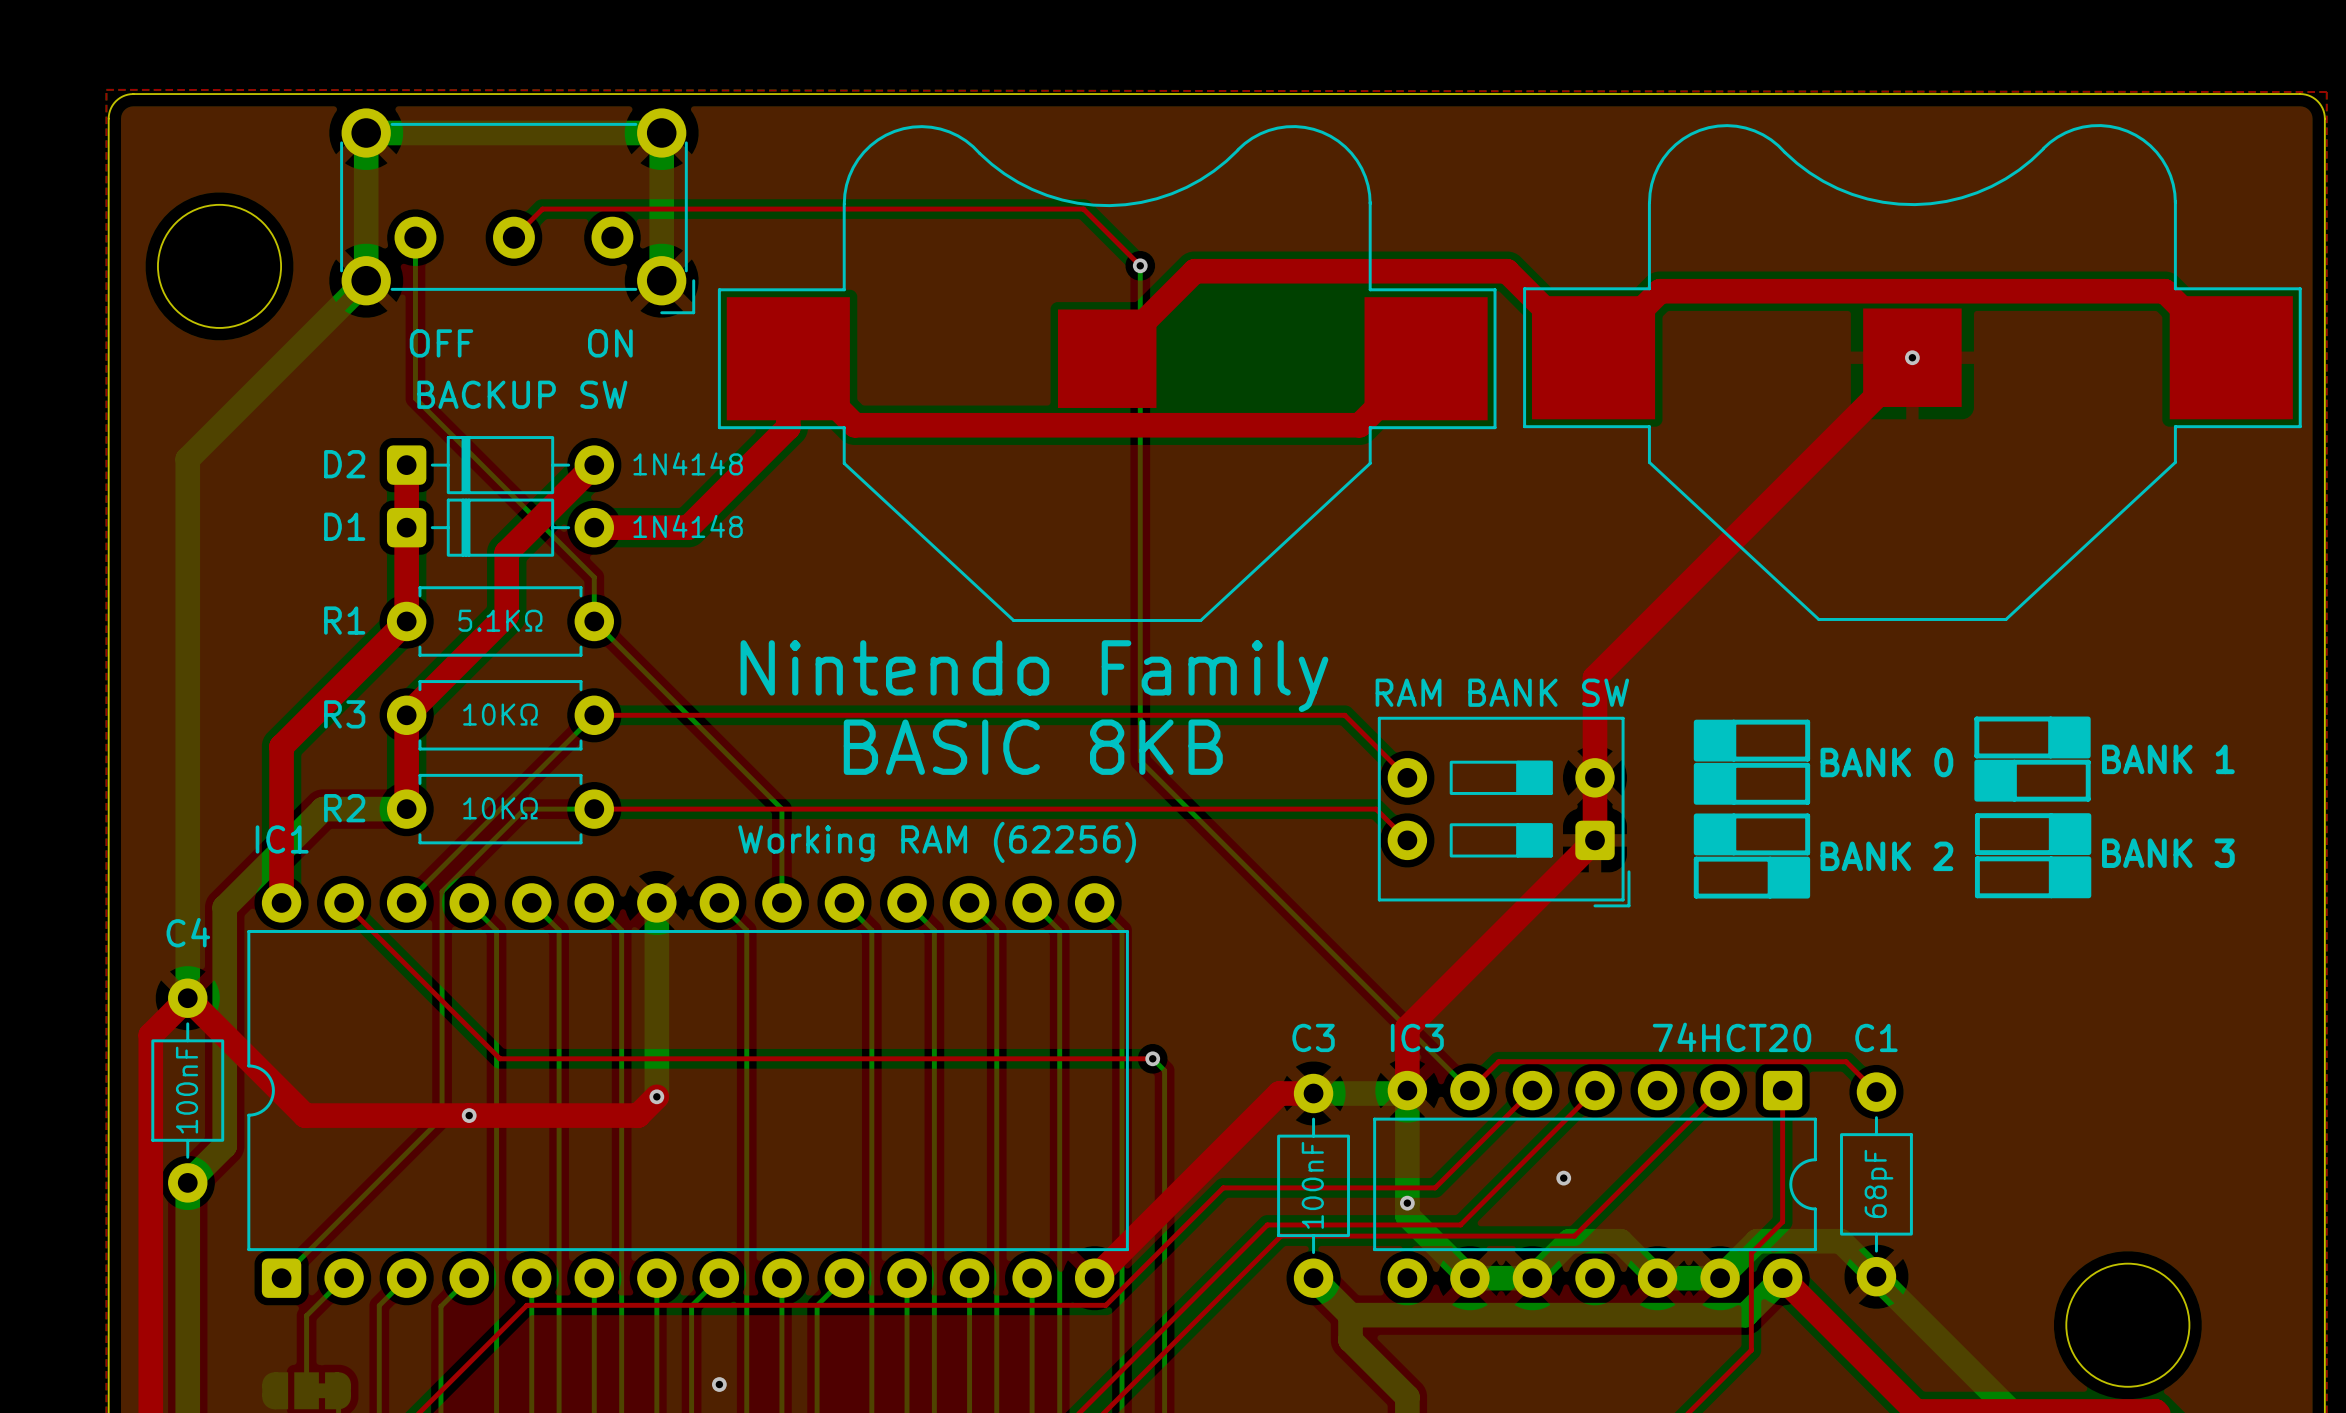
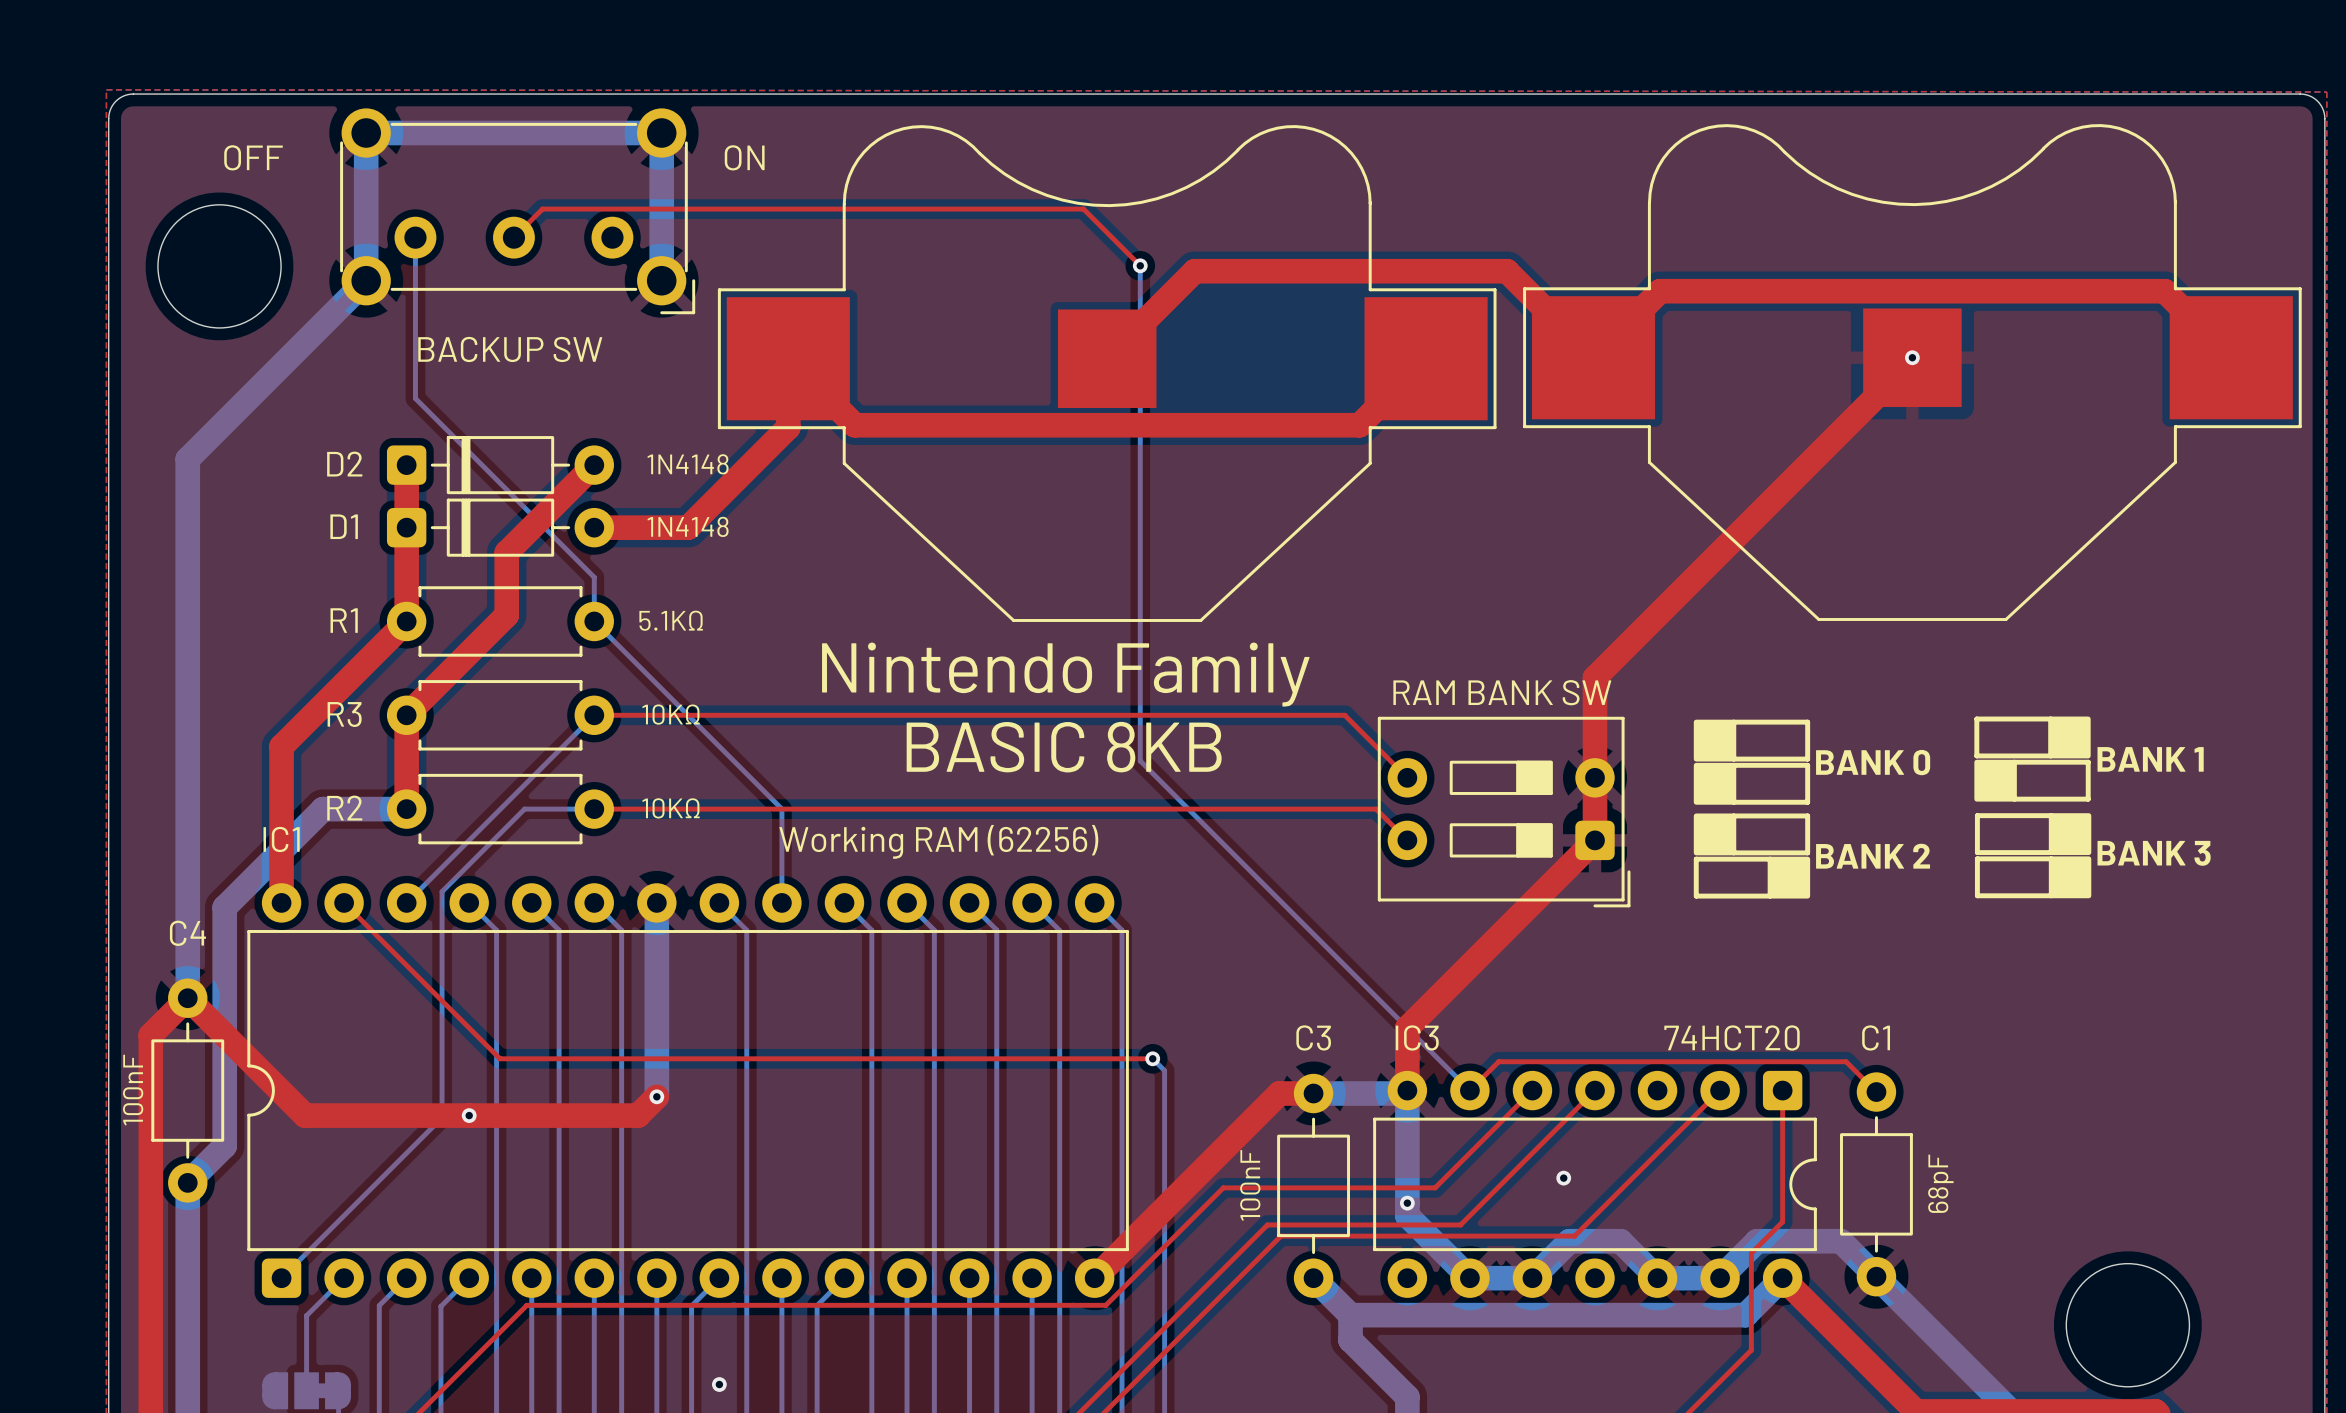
text position: OFF (441, 343) -> OFF (253, 157)
text position: ON (610, 343) -> ON (744, 157)
part value position: BACKUP SW (522, 394) -> BACKUP SW (510, 349)
R1 value position: 5.1KΩ (500, 620) -> 5.1KΩ (671, 620)
text position: Nintendo Family (1034, 676) -> Nintendo Family (1065, 674)
R3 value position: 10KΩ (500, 714) -> 10KΩ (671, 714)
text position: BASIC 8KB (1033, 747) -> BASIC 8KB (1064, 747)
R2 value position: 10KΩ (500, 808) -> 10KΩ (671, 808)
C4 value position: 100nF (187, 1090) -> 100nF (133, 1090)
C1 value position: 68pF (1879, 1183) -> 68pF (1940, 1183)
C3 value position: 100nF (1312, 1185) -> 100nF (1250, 1185)

